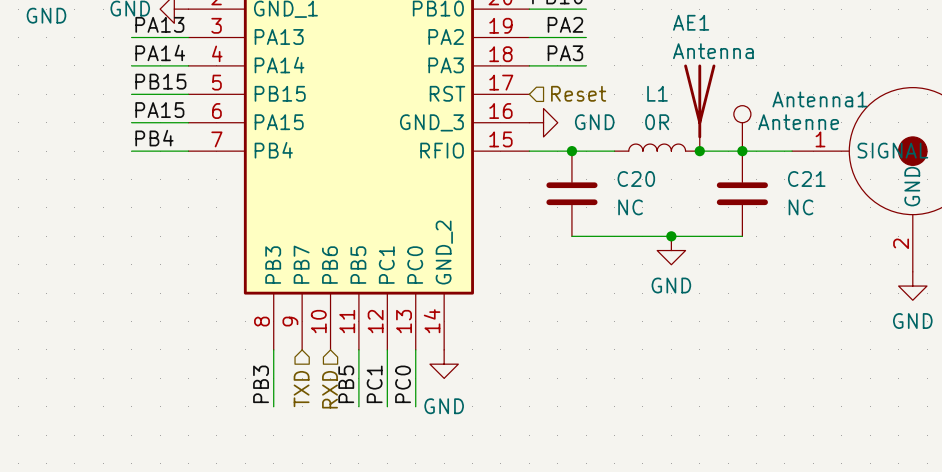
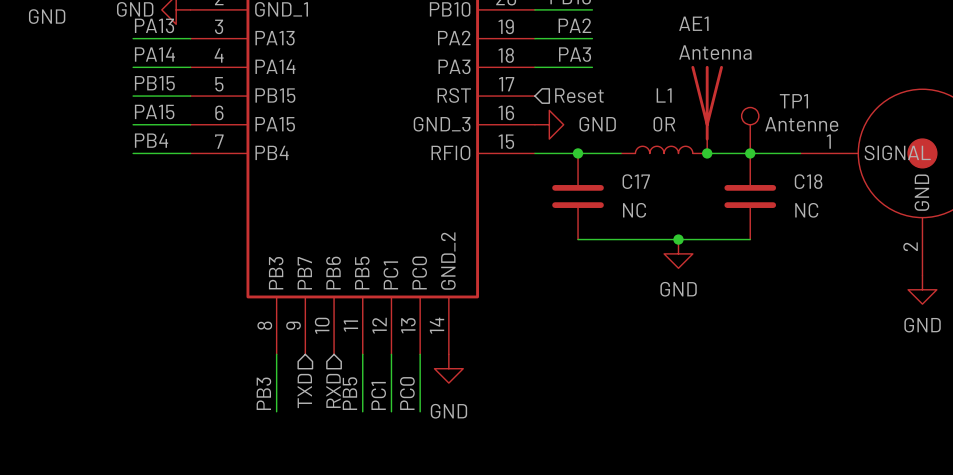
Antenna1 name: Antenna1 (819, 99) -> TP1 (793, 101)
C20 name: C20 (636, 179) -> C17 (636, 181)
C21 name: C21 (806, 179) -> C18 (808, 181)

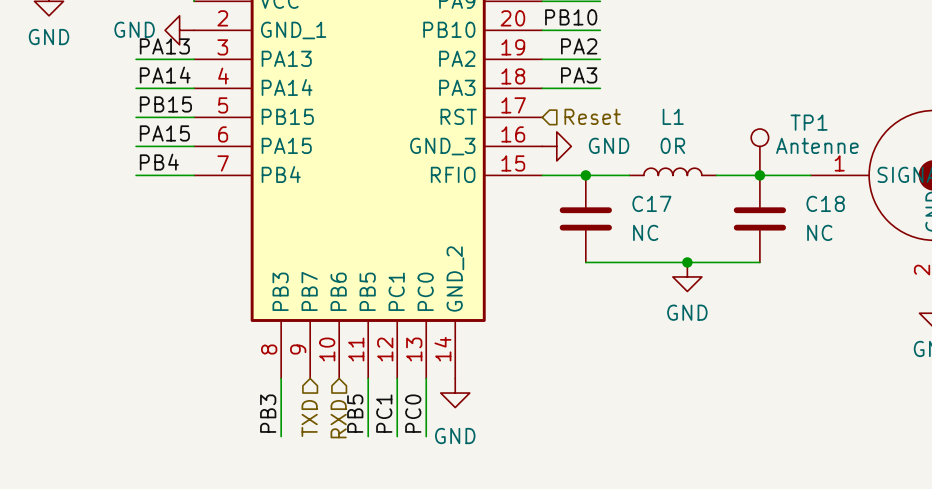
AE1: Antenna (707, 109) -> none
junction: (707, 153) -> none

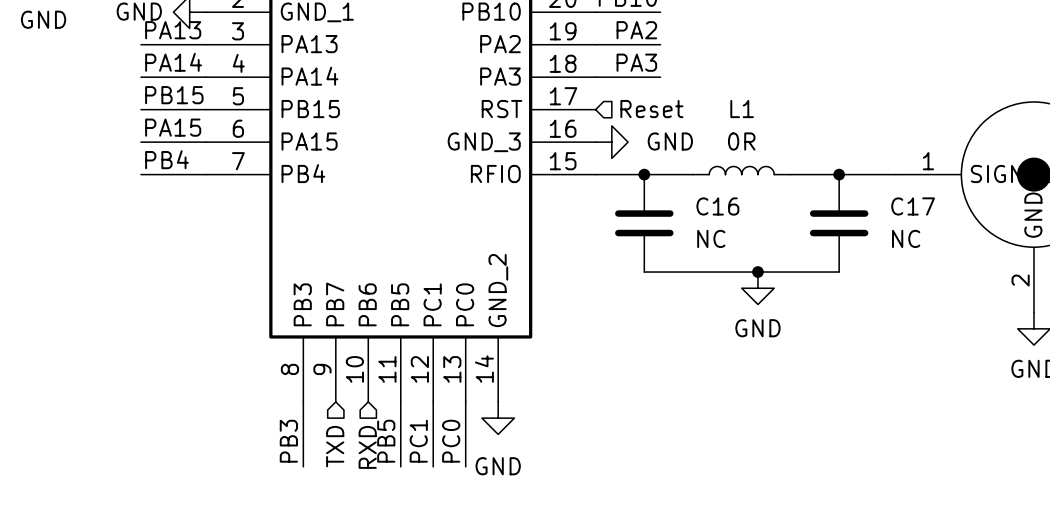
TP1: Antenne (759, 152) -> none
C17 name: C17 (651, 203) -> C16 (717, 206)
C18 name: C18 (825, 203) -> C17 (913, 206)

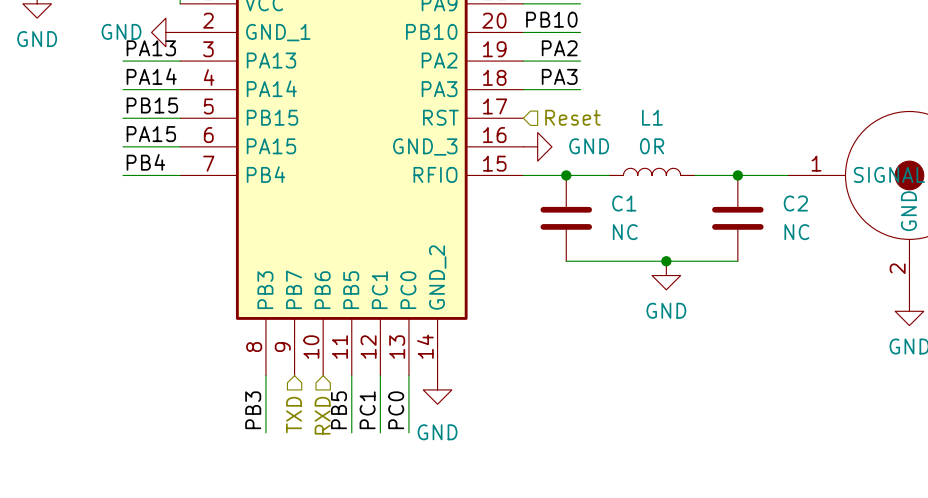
C16 name: C16 (717, 206) -> C1 (624, 203)
C17 name: C17 (913, 206) -> C2 (795, 203)

